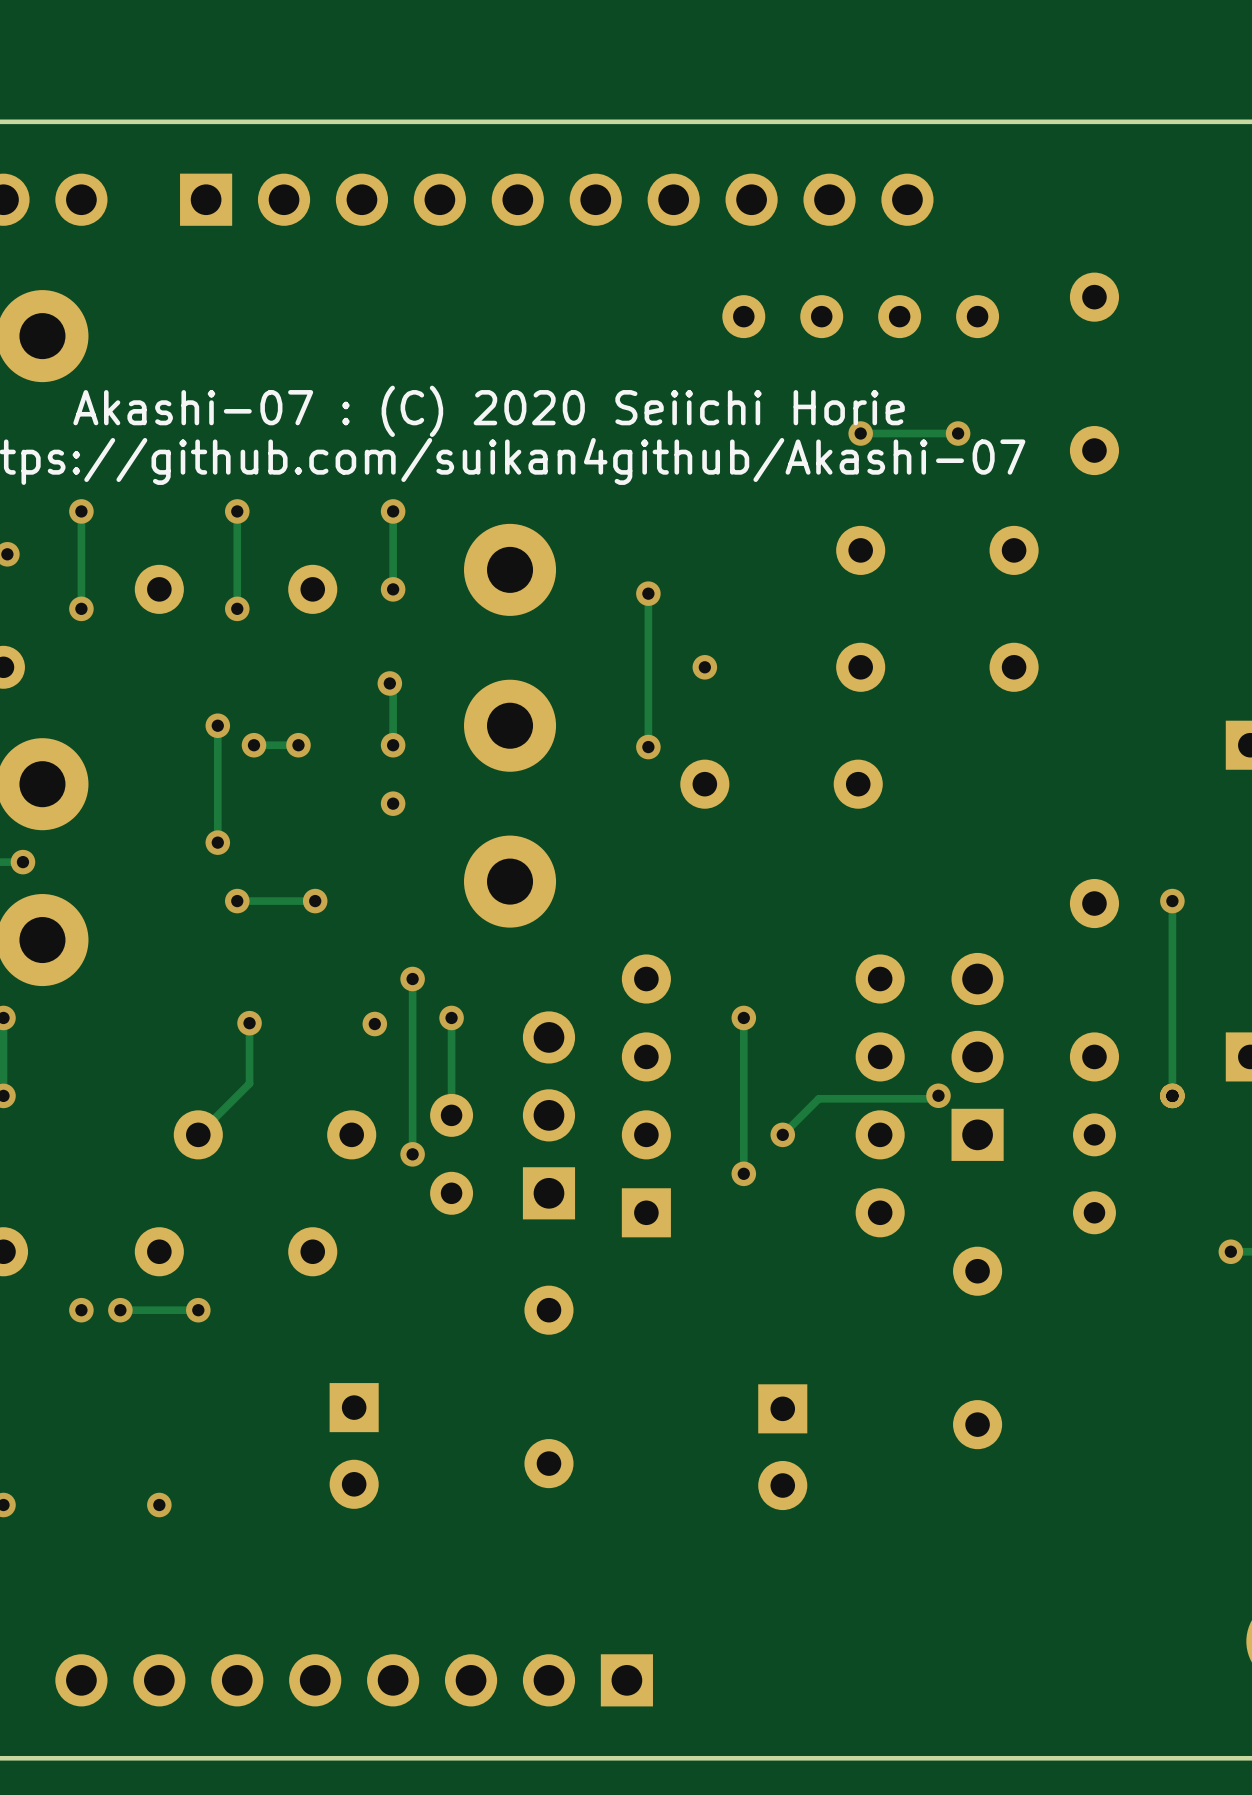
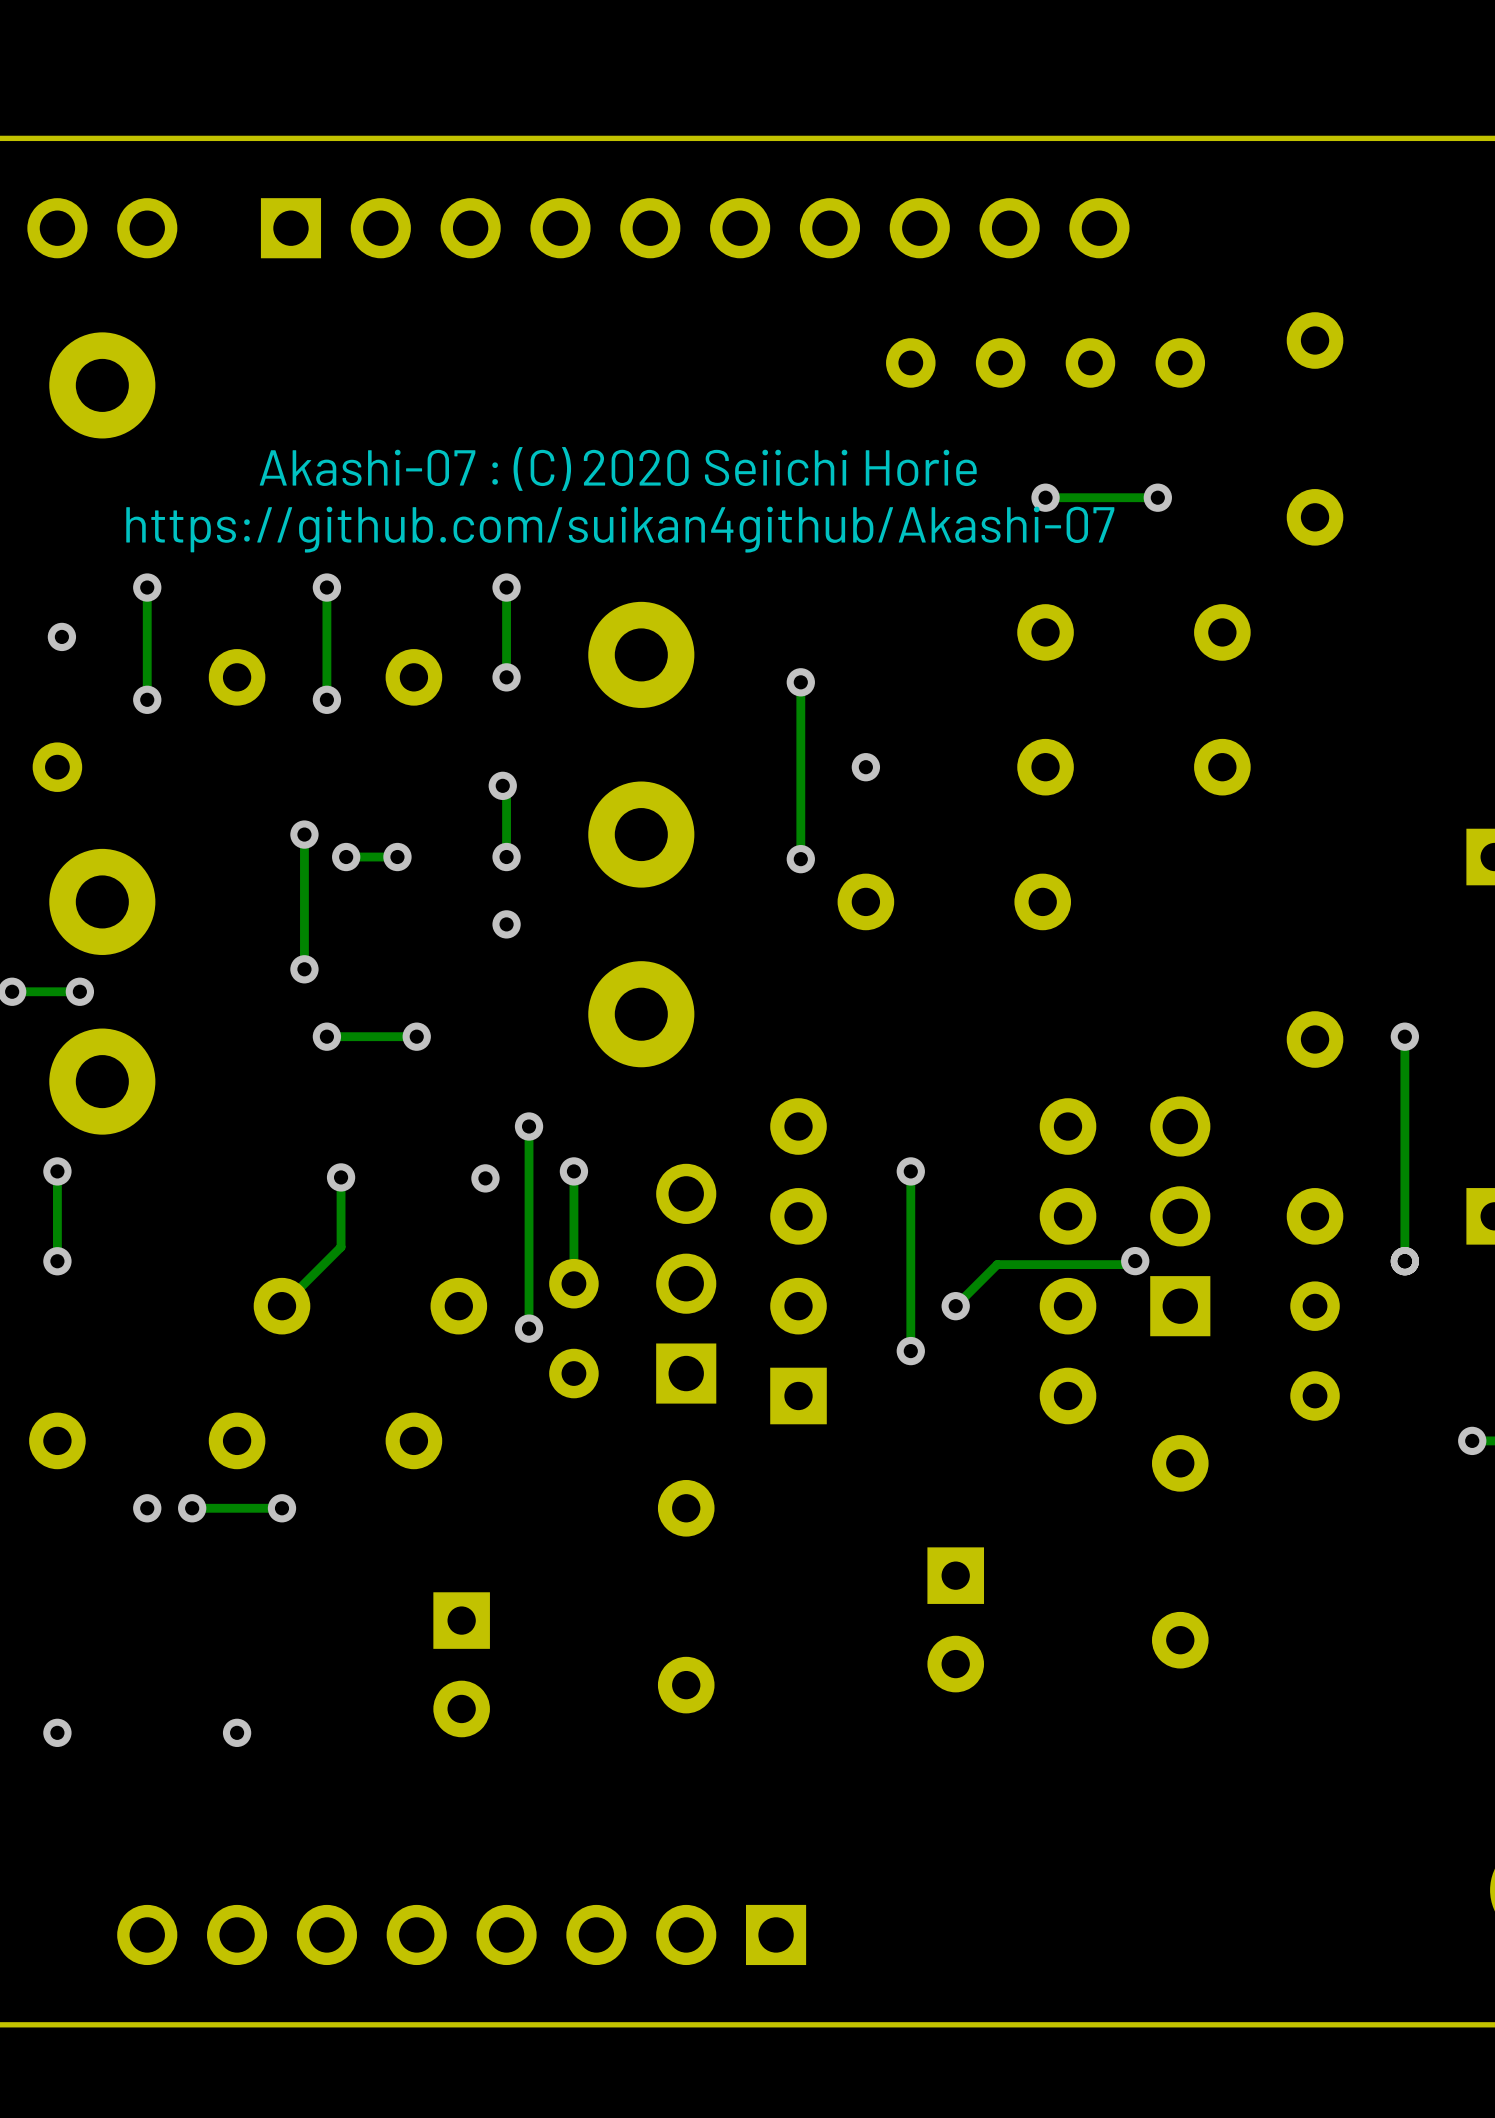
part position: (782, 1447) -> (955, 1619)

